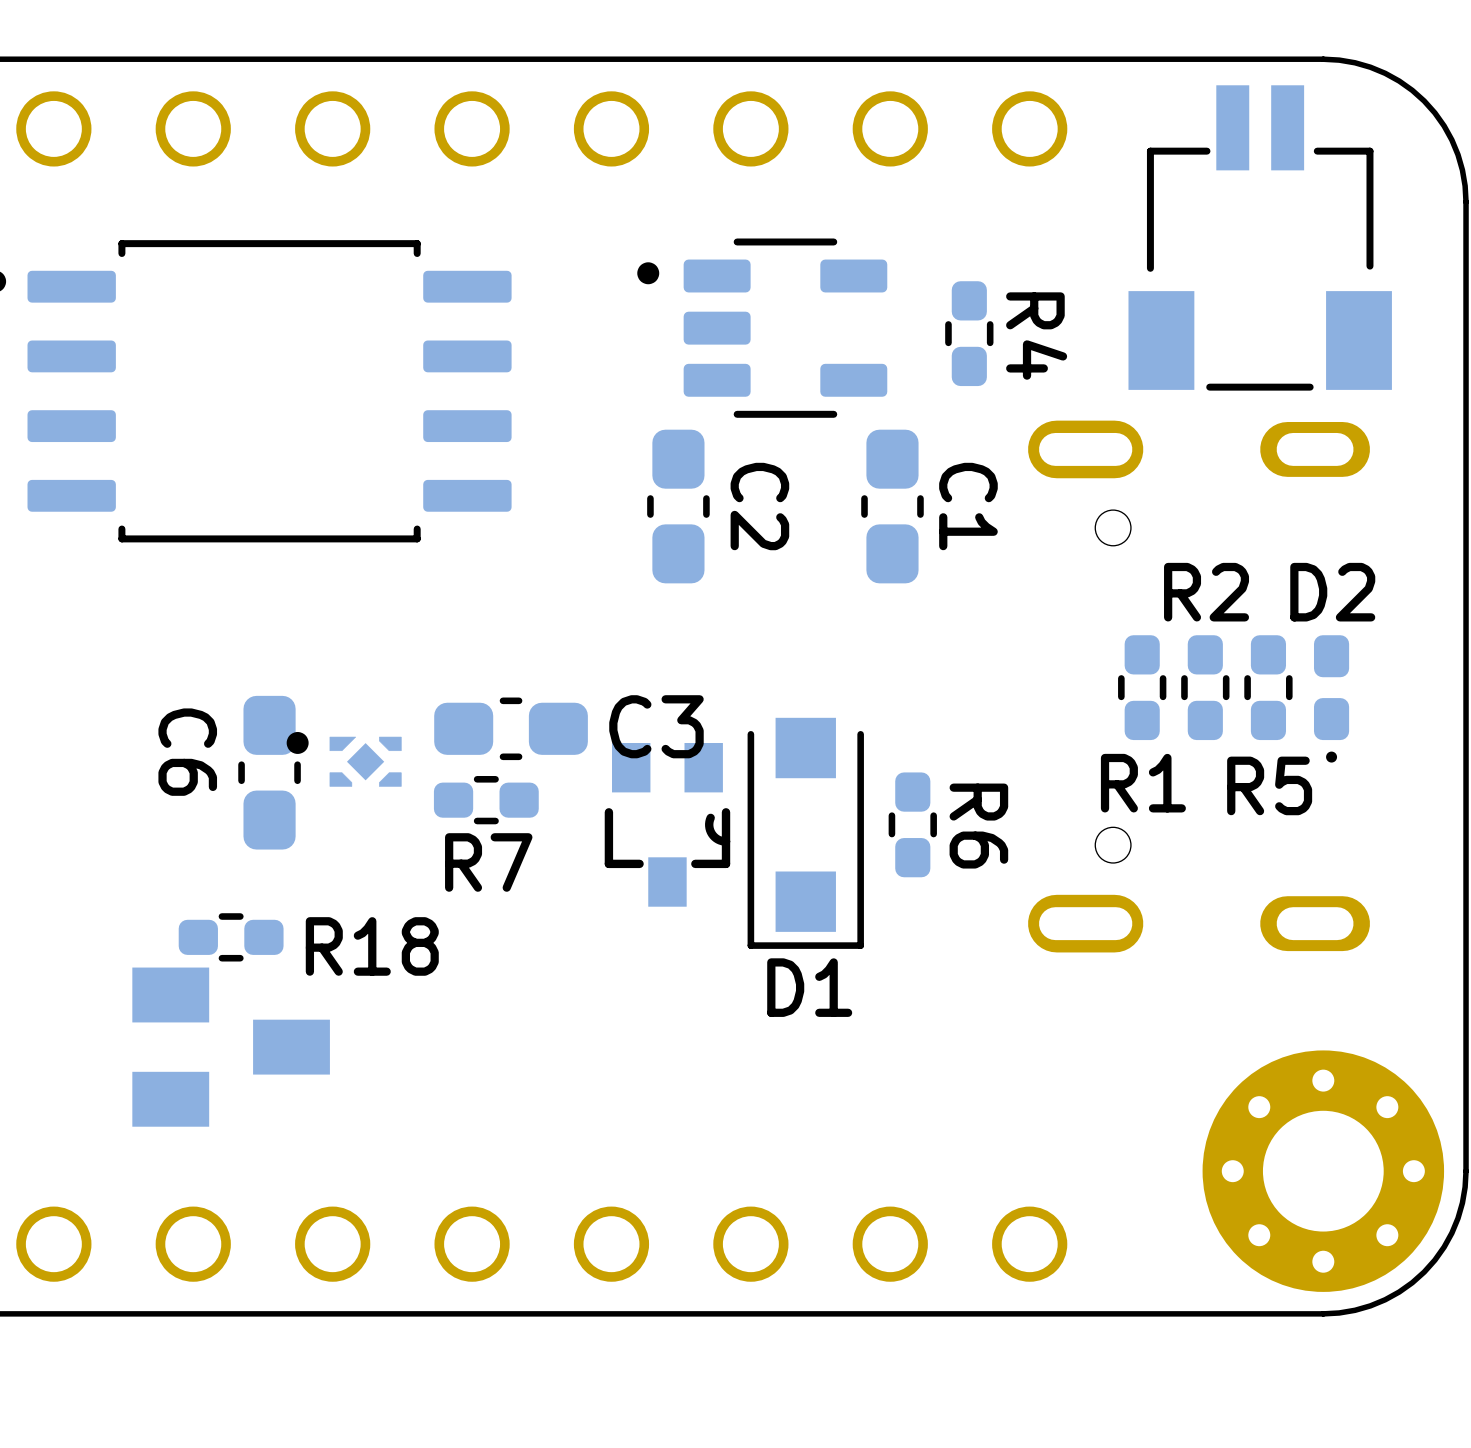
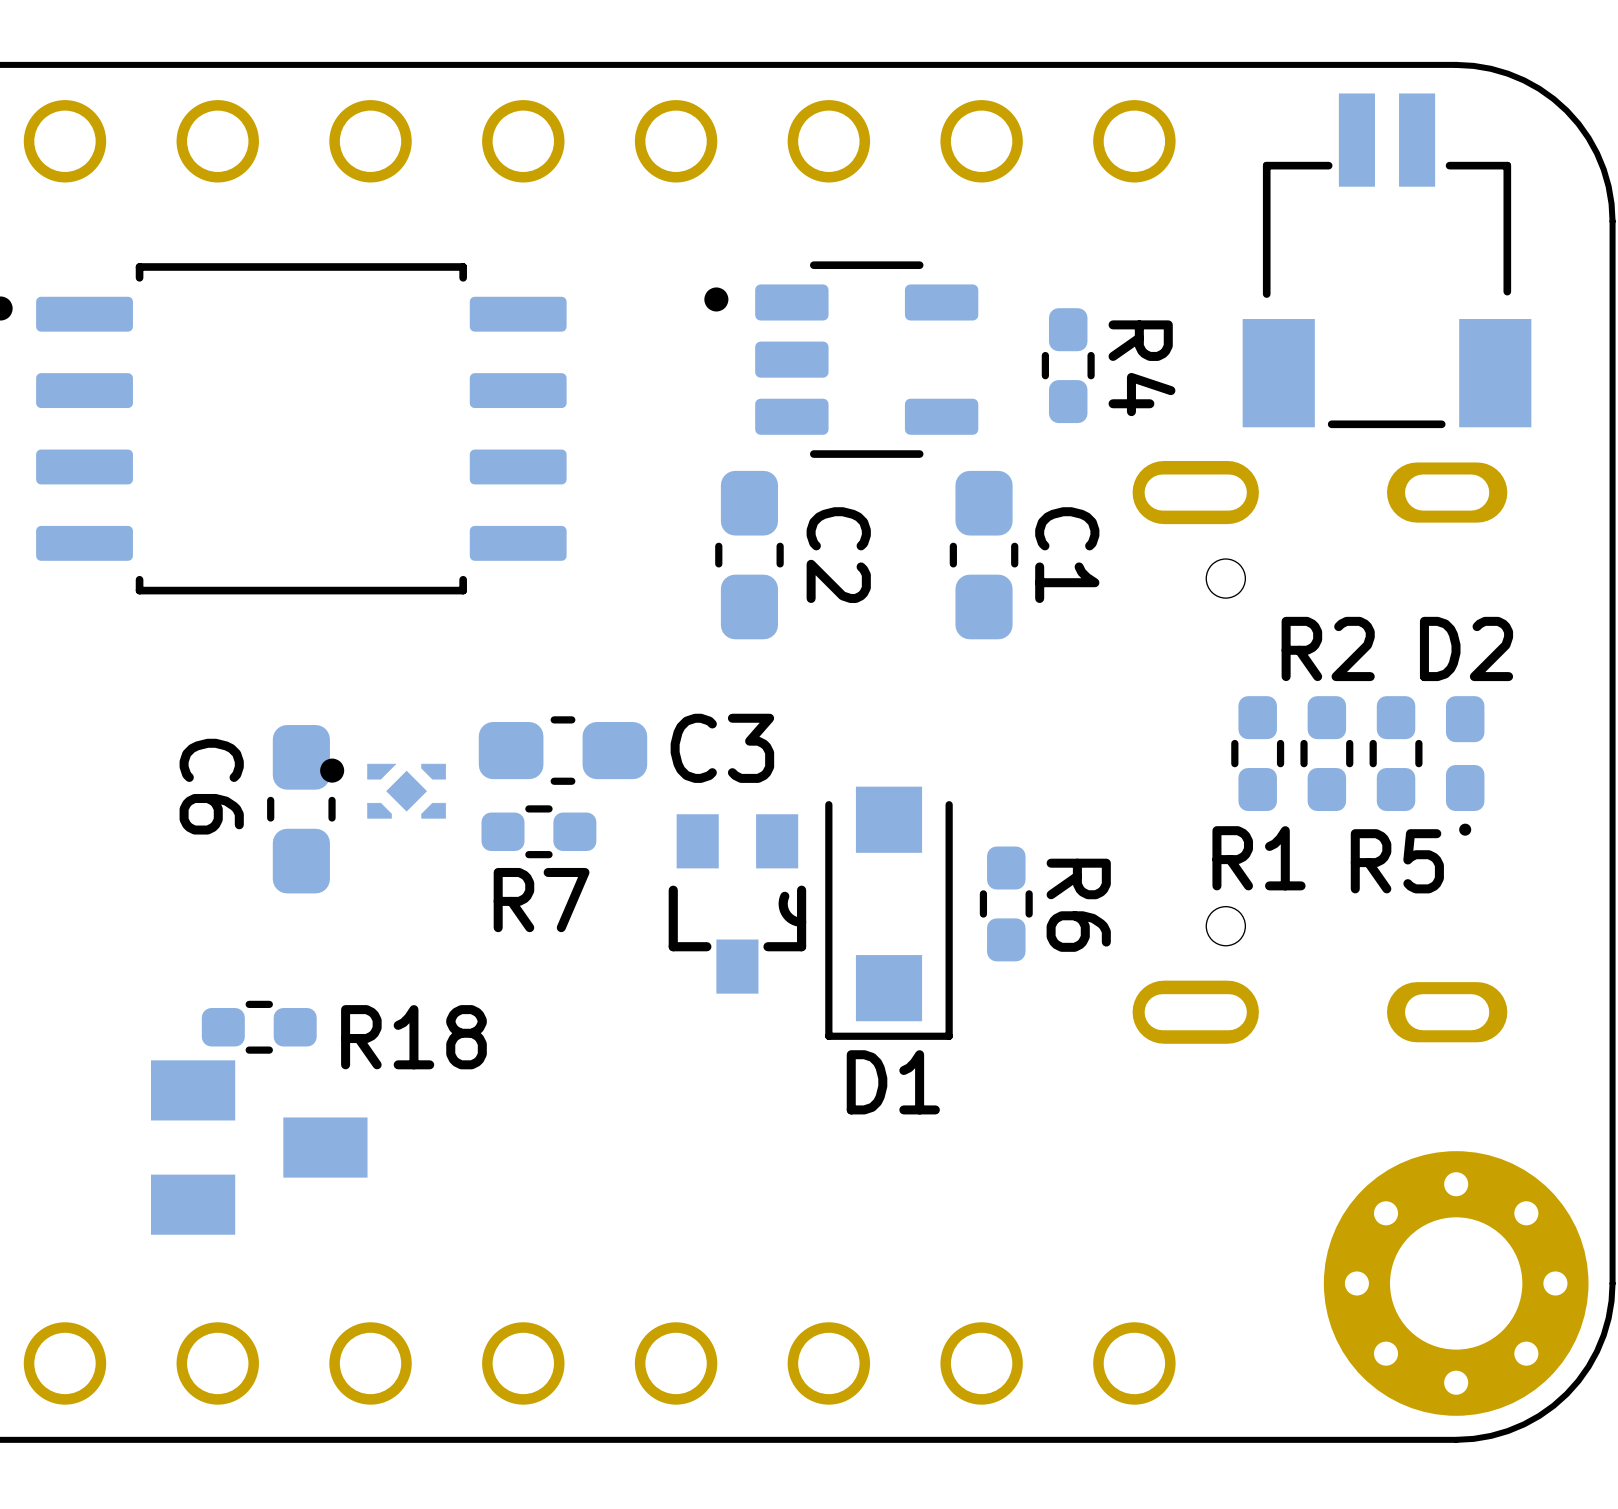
C3 position: (511, 728) -> (563, 750)
part position: (344, 759) -> (383, 788)
C6 position: (269, 772) -> (301, 809)
R7 position: (486, 800) -> (538, 831)

